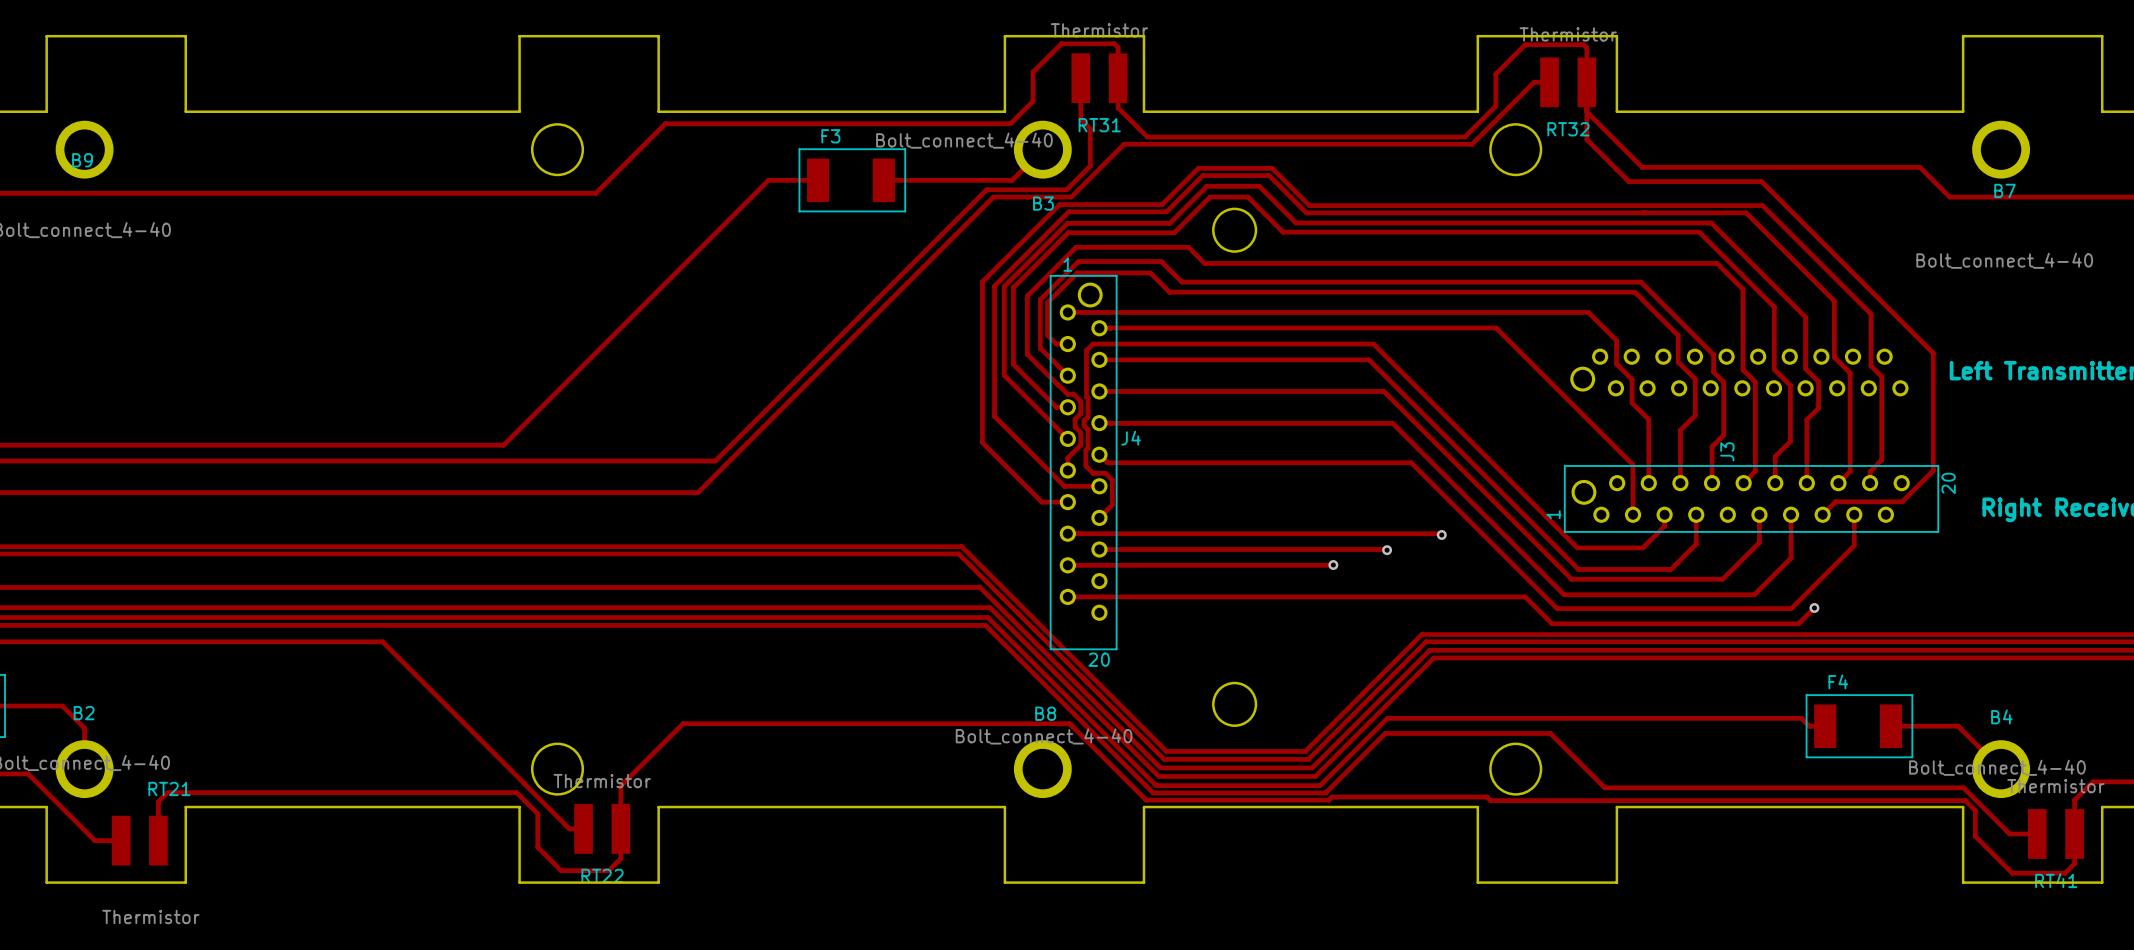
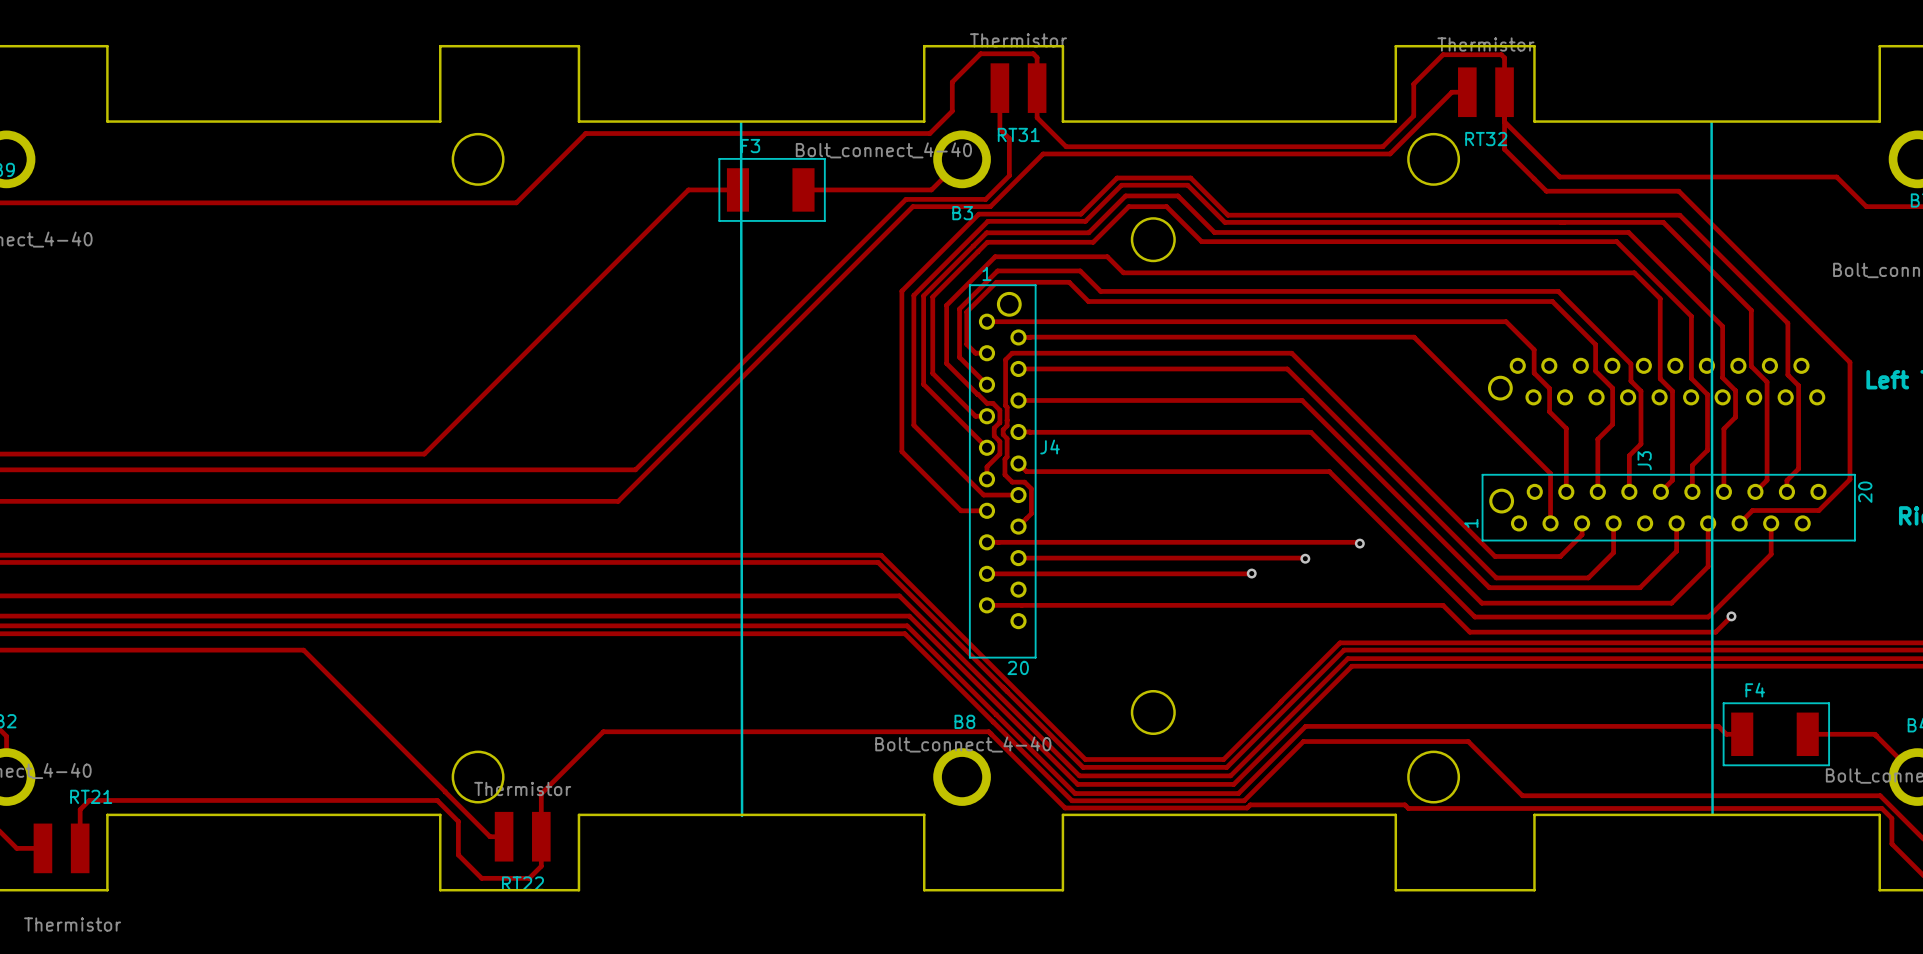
line: none -> (741, 122) (742, 815)
line: none -> (1711, 122) (1712, 814)

